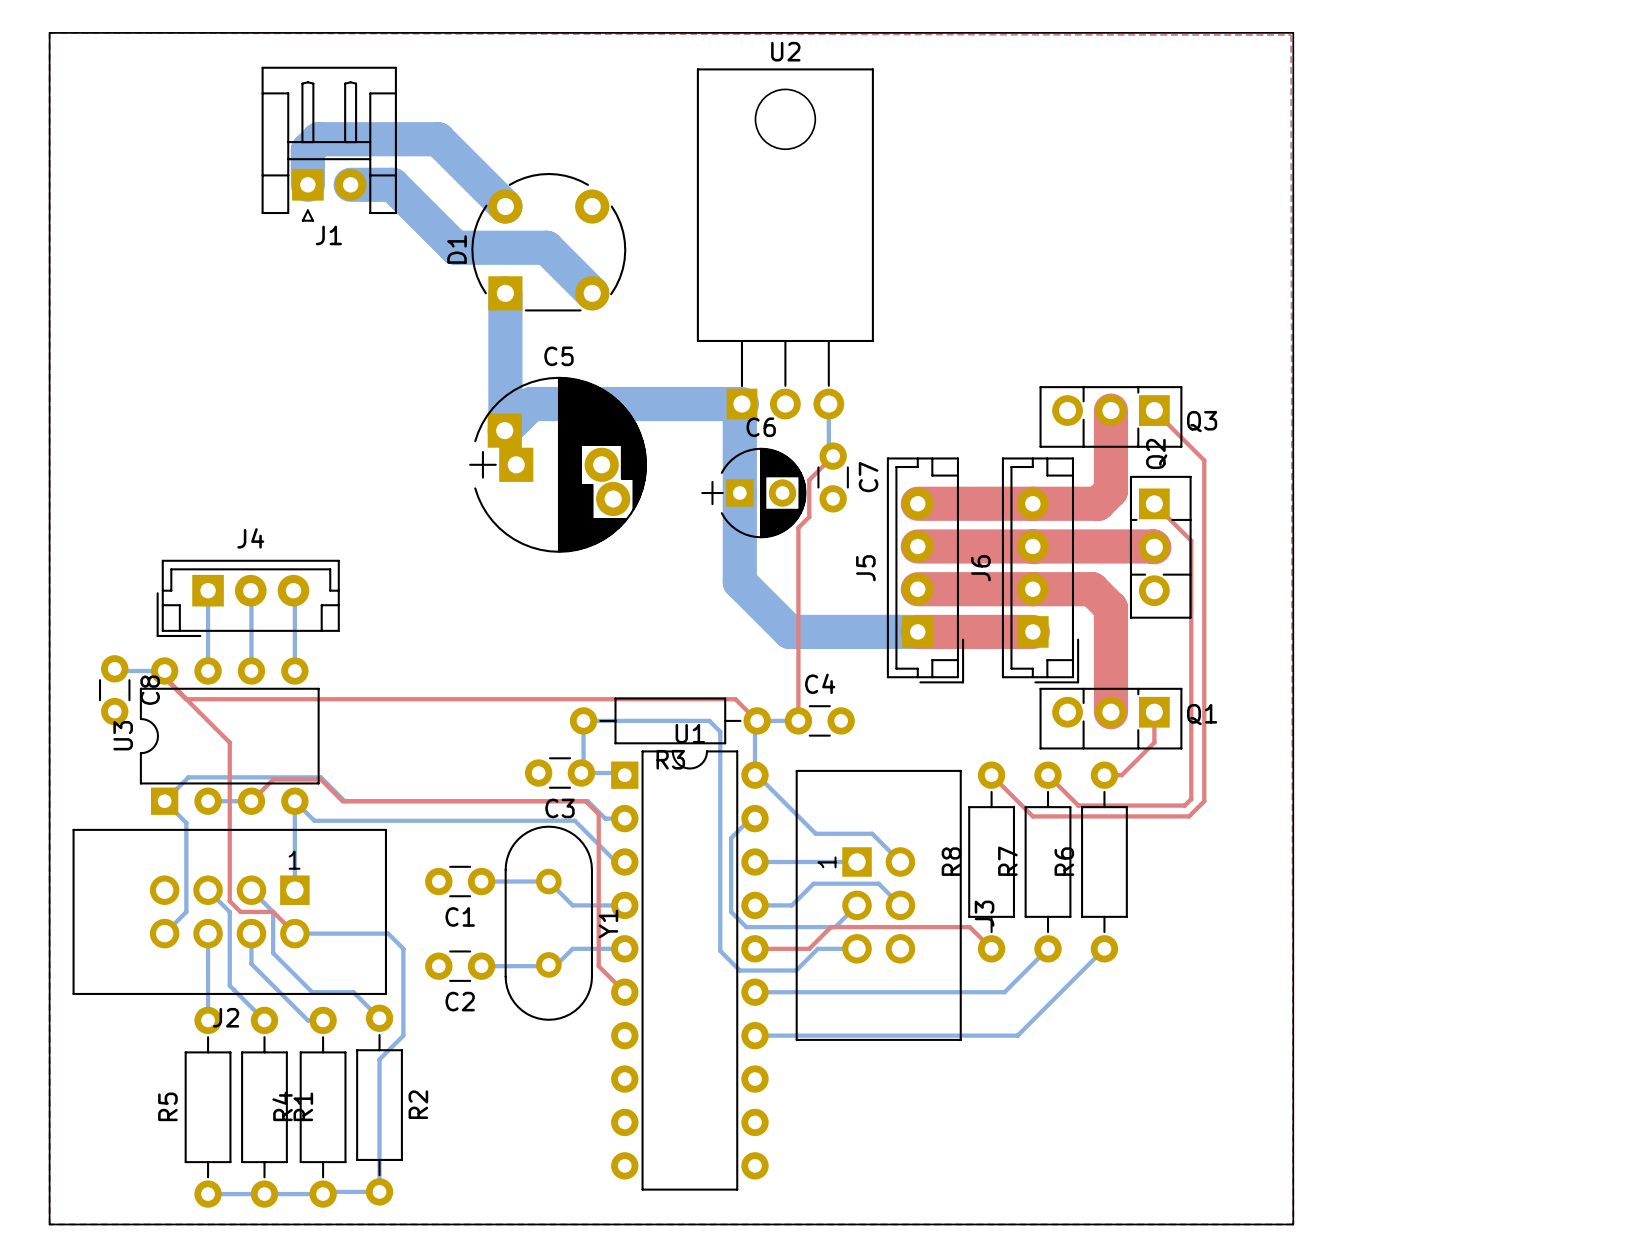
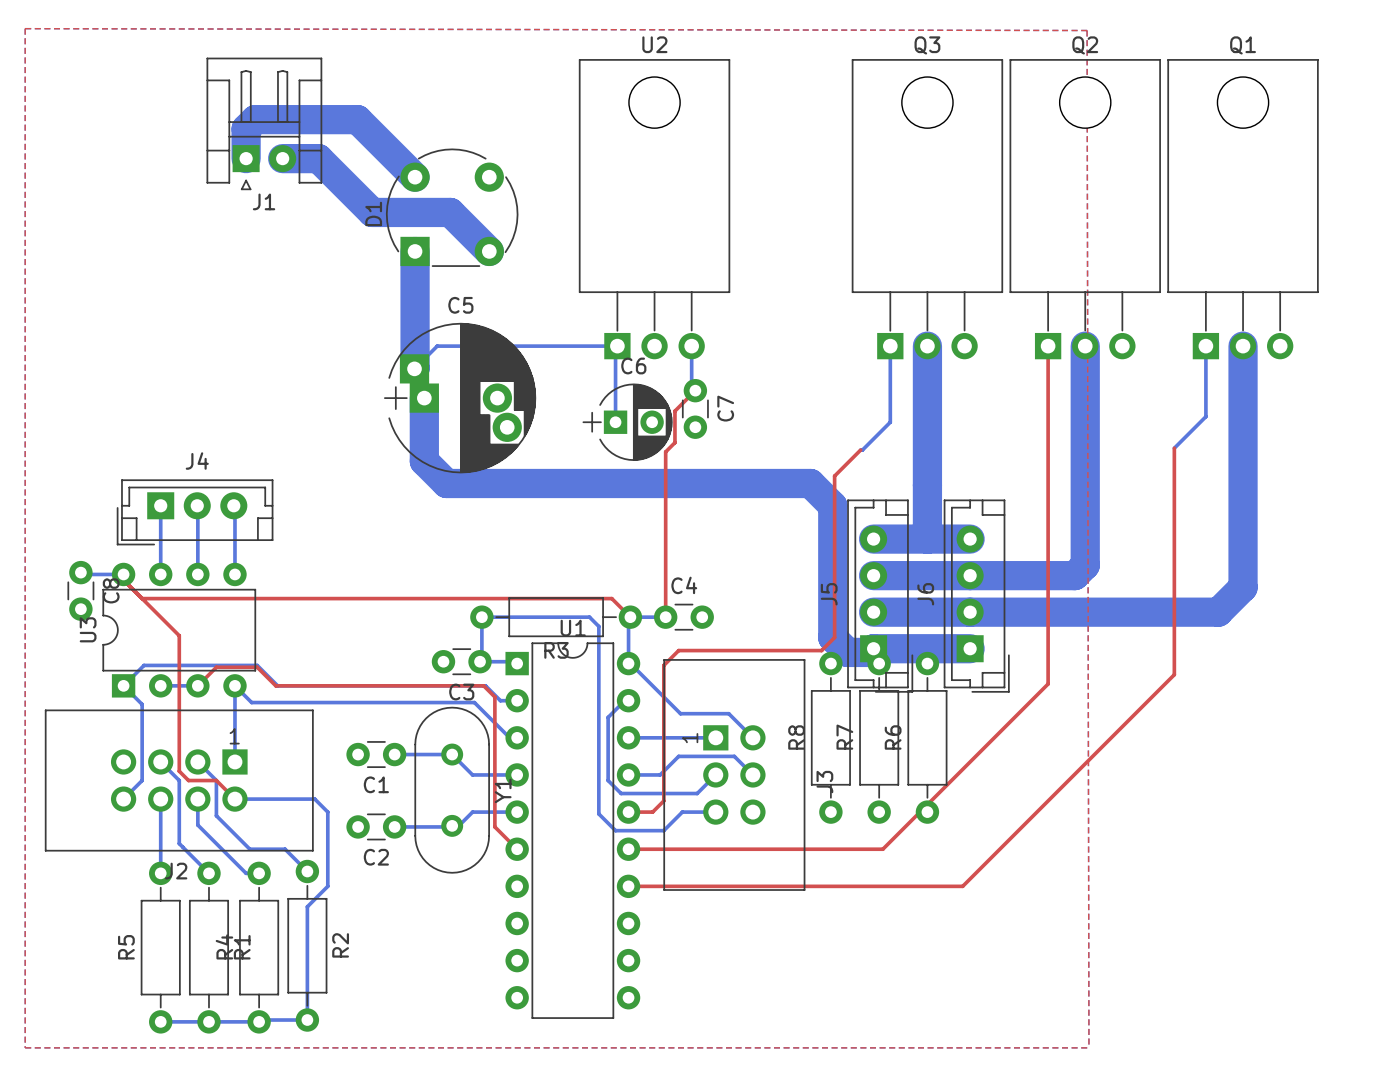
board edge: (49, 32) (1293, 32) (1293, 1224) (49, 1224) (49, 32) -> none
Q3 footprint: [1039, 386, 1183, 448] -> [851, 59, 1004, 360]
bottom track width: thick (741, 404) (531, 404) (505, 429) -> thin (617, 346) (437, 346) (415, 368)
bottom track: none -> (890, 346) (890, 422) (860, 450)
bottom track: none -> (927, 346) (927, 539)
top track: none -> (1048, 346) (1048, 683) (882, 849) (628, 849)
bottom track: none -> (1085, 346) (1085, 565) (1074, 575) (873, 575)
bottom track: none -> (1205, 346) (1205, 416) (1174, 448)
bottom track: none -> (1243, 346) (1243, 587) (1218, 612) (873, 612)
bottom track width: thick (739, 406) (739, 493) -> thin (615, 347) (615, 422)
top track: (1110, 410) (1110, 490) (1098, 503) (917, 503) -> none
top track: (1154, 410) (1204, 460) (1204, 801) (1189, 816) (1032, 816) (991, 775) -> none
Q3 name position: Q3 (1202, 421) -> Q3 (927, 45)
Q2 name position: Q2 (1156, 453) -> Q2 (1085, 45)
bottom track: none -> (424, 398) (424, 461) (446, 483) (810, 483) (832, 505) (832, 637) (847, 652) (869, 652) (873, 648) (970, 648)
Q2 footprint: [1129, 475, 1192, 619] -> [1009, 59, 1161, 360]
bottom track: (739, 493) (739, 582) (789, 631) (917, 631) -> none
top track: (1154, 503) (1191, 540) (1191, 799) (1184, 805) (1078, 805) (1048, 775) -> none
top track: none -> (1174, 448) (1174, 674) (962, 886) (628, 886)
top track: (917, 546) (1154, 547) -> none
J5 position: (925, 570) -> (880, 596)
J6 position: (1040, 570) -> (976, 596)
top track: (917, 589) (1092, 589) (1110, 608) (1110, 712) -> none
bottom track: none -> (873, 539) (970, 539)
top track: (917, 631) (1032, 631) -> none
Q1 footprint: [1039, 687, 1183, 750] -> [1167, 59, 1319, 360]
top track: (1154, 712) (1154, 742) (1121, 775) (1104, 775) -> none
Q1 name position: Q1 (1202, 714) -> Q1 (1243, 45)
top track: (783, 948) (809, 948) (830, 927) (969, 927) (991, 948) -> (652, 812) (663, 800) (663, 665) (678, 650) (821, 650) (834, 637) (834, 476) (860, 450)
bottom track: (1048, 948) (1004, 992) (755, 992) -> none
bottom track: (1104, 948) (1017, 1035) (755, 1035) -> none

